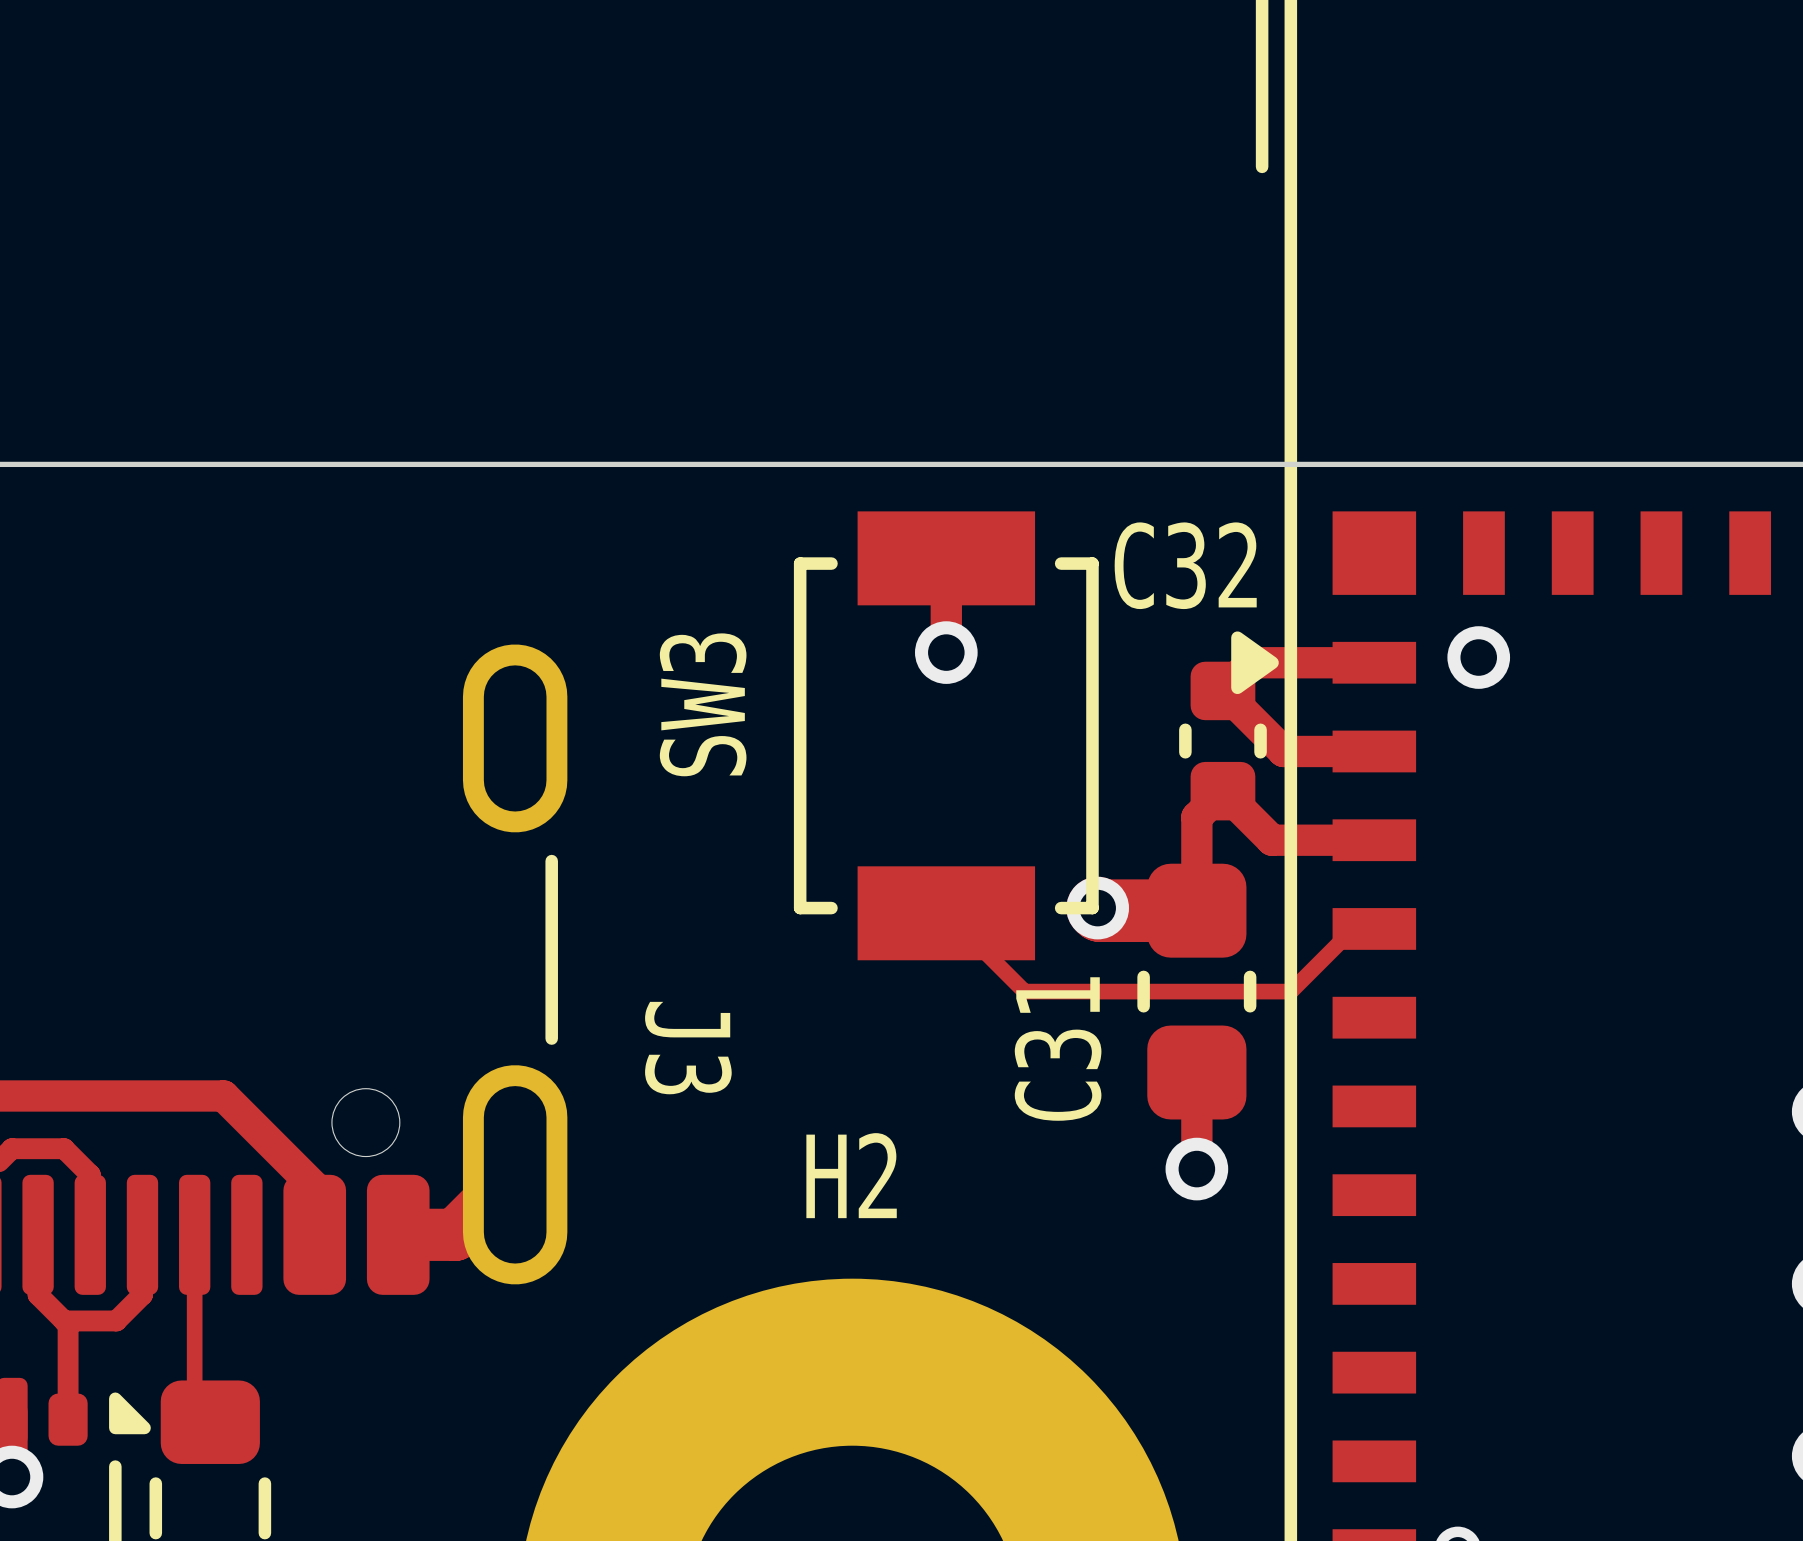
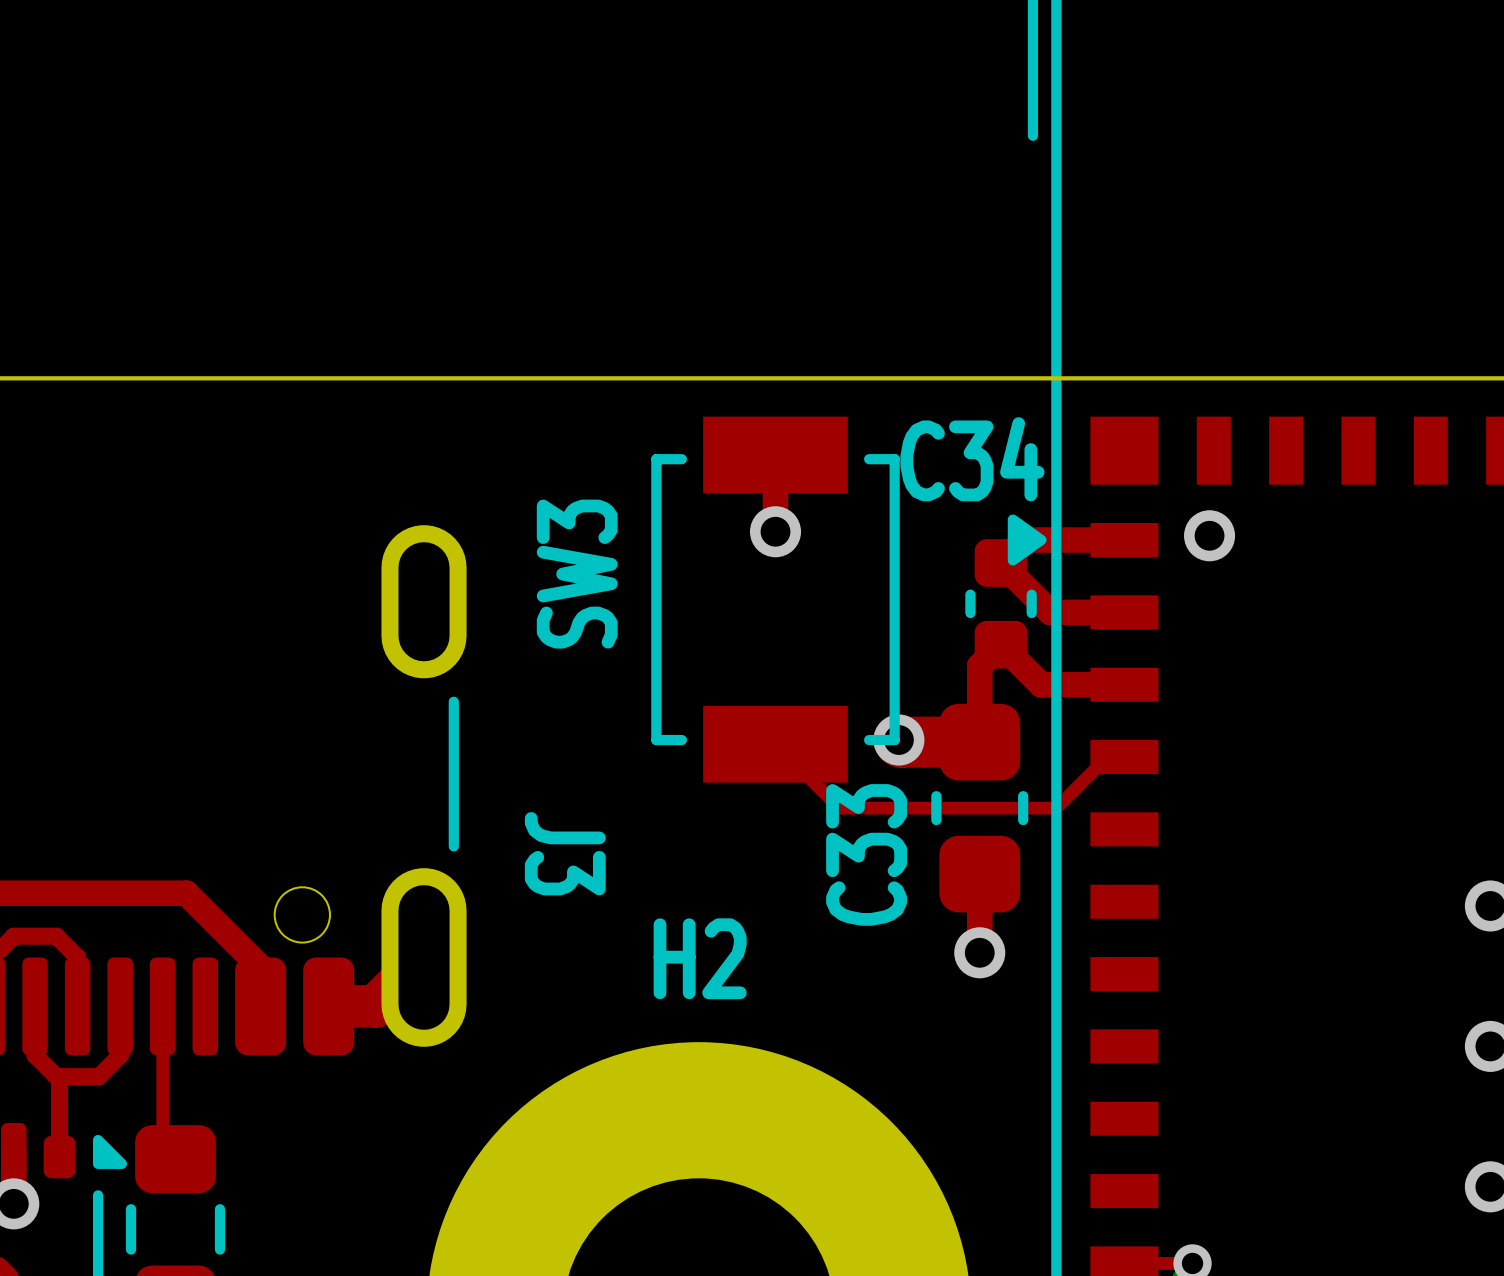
C32 name: C32 (1185, 565) -> C34 (972, 459)
C31 name: C31 (1058, 1049) -> C33 (866, 854)

